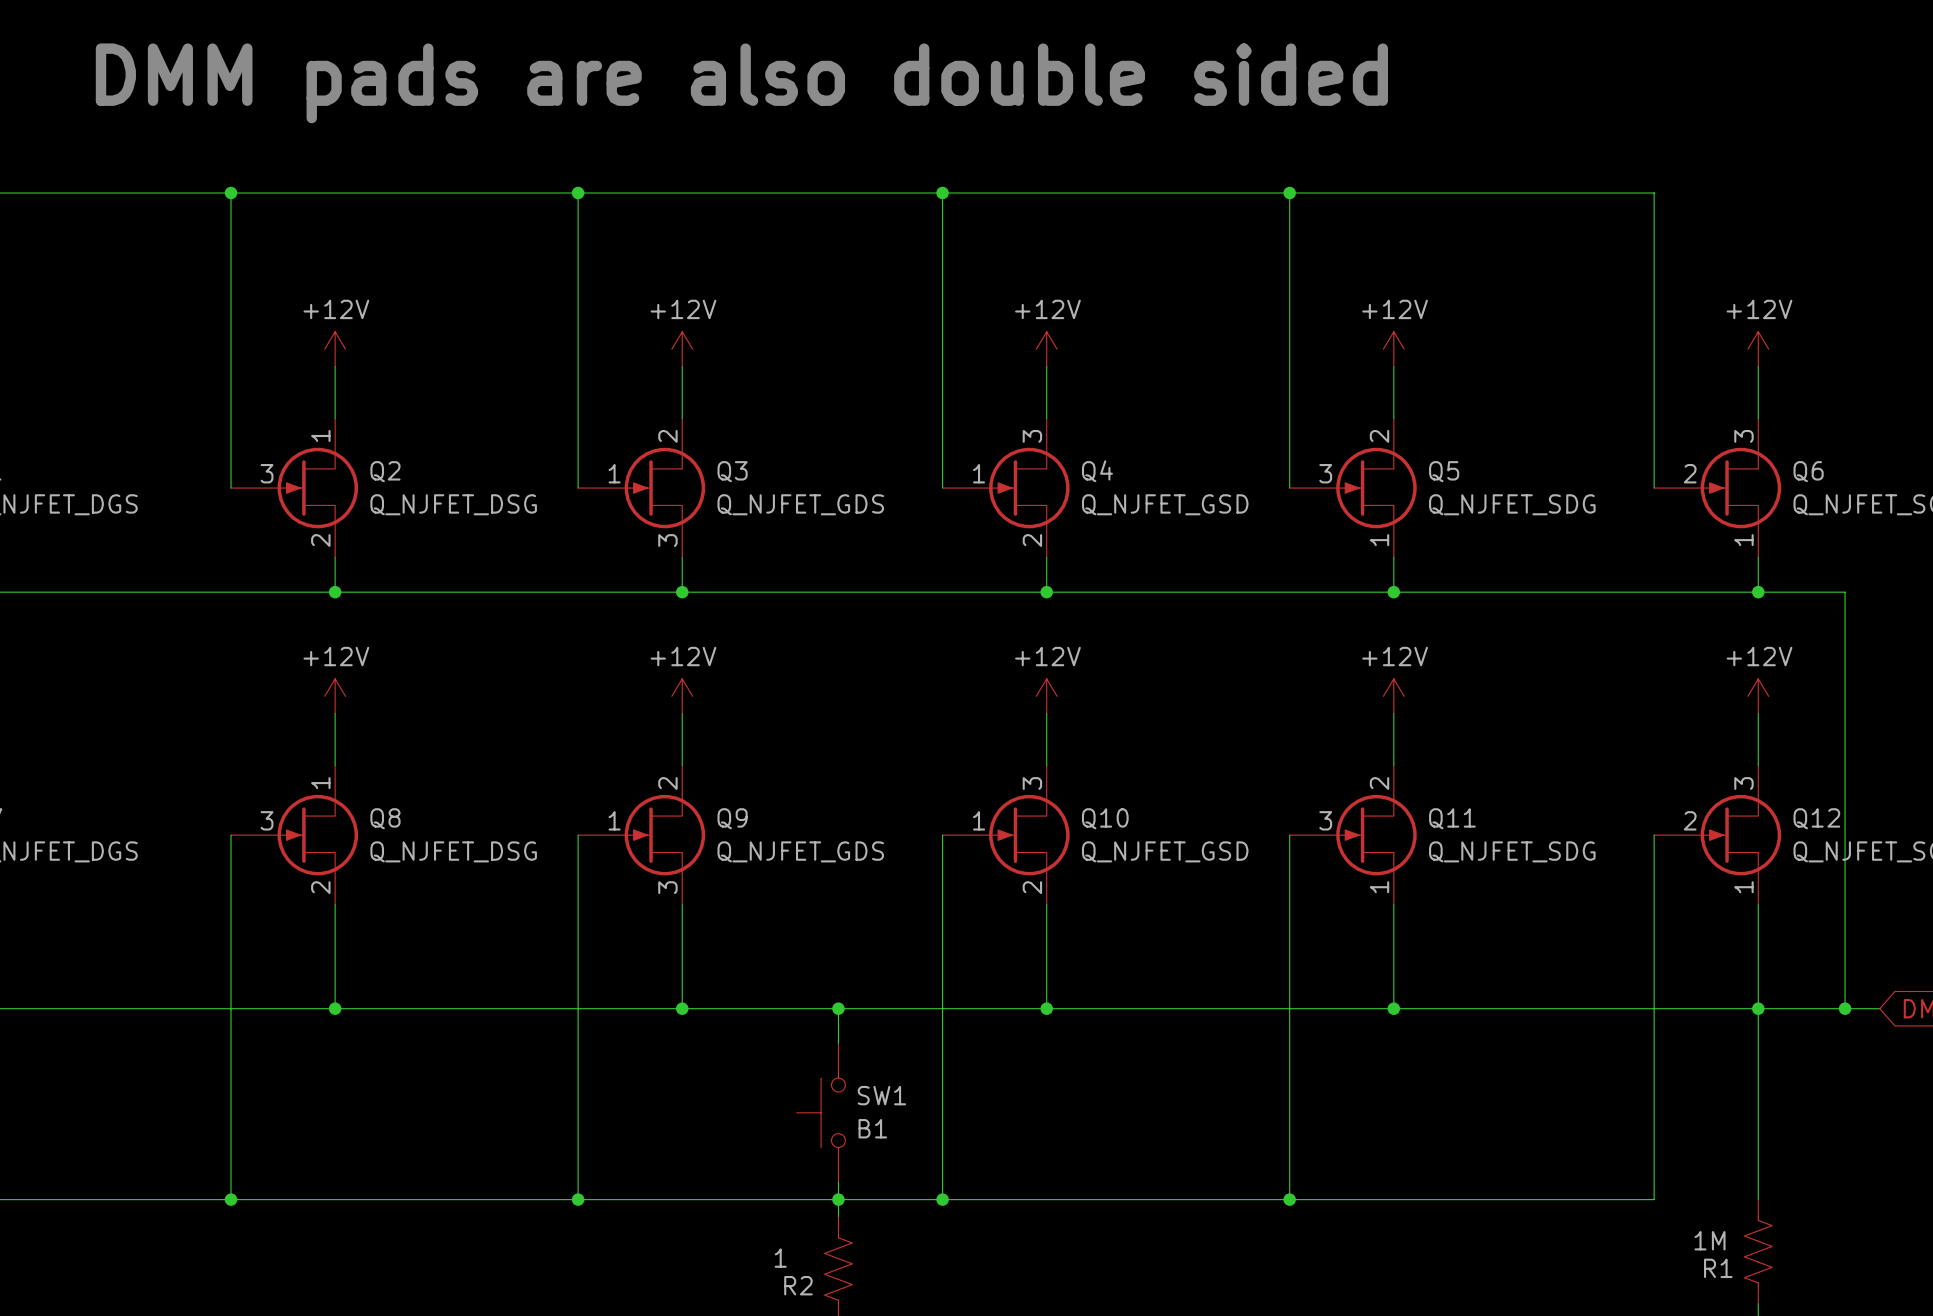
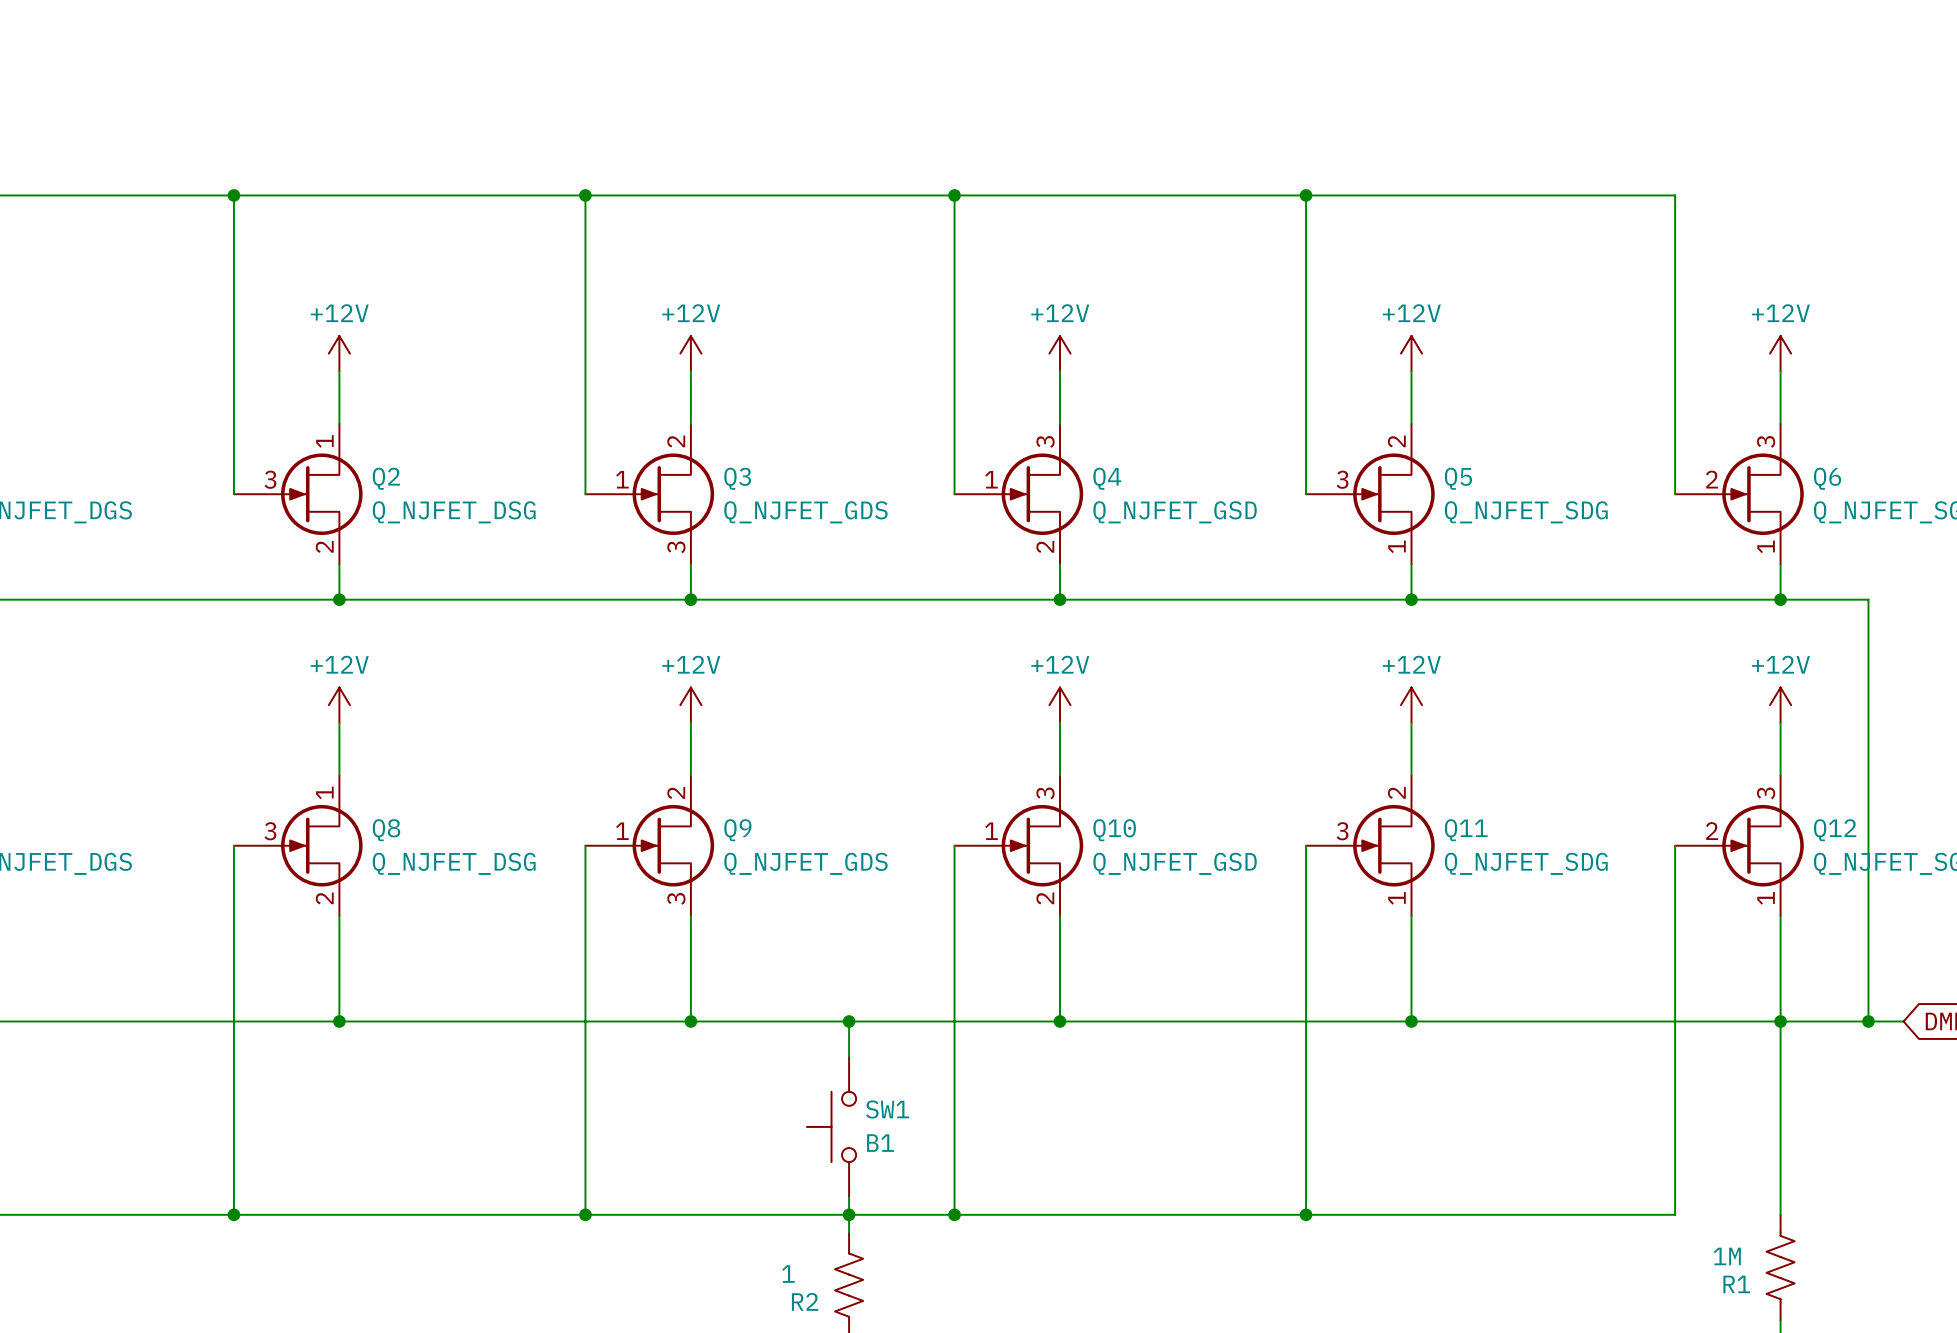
text: DMM pads are also double sided (741, 83) -> none

